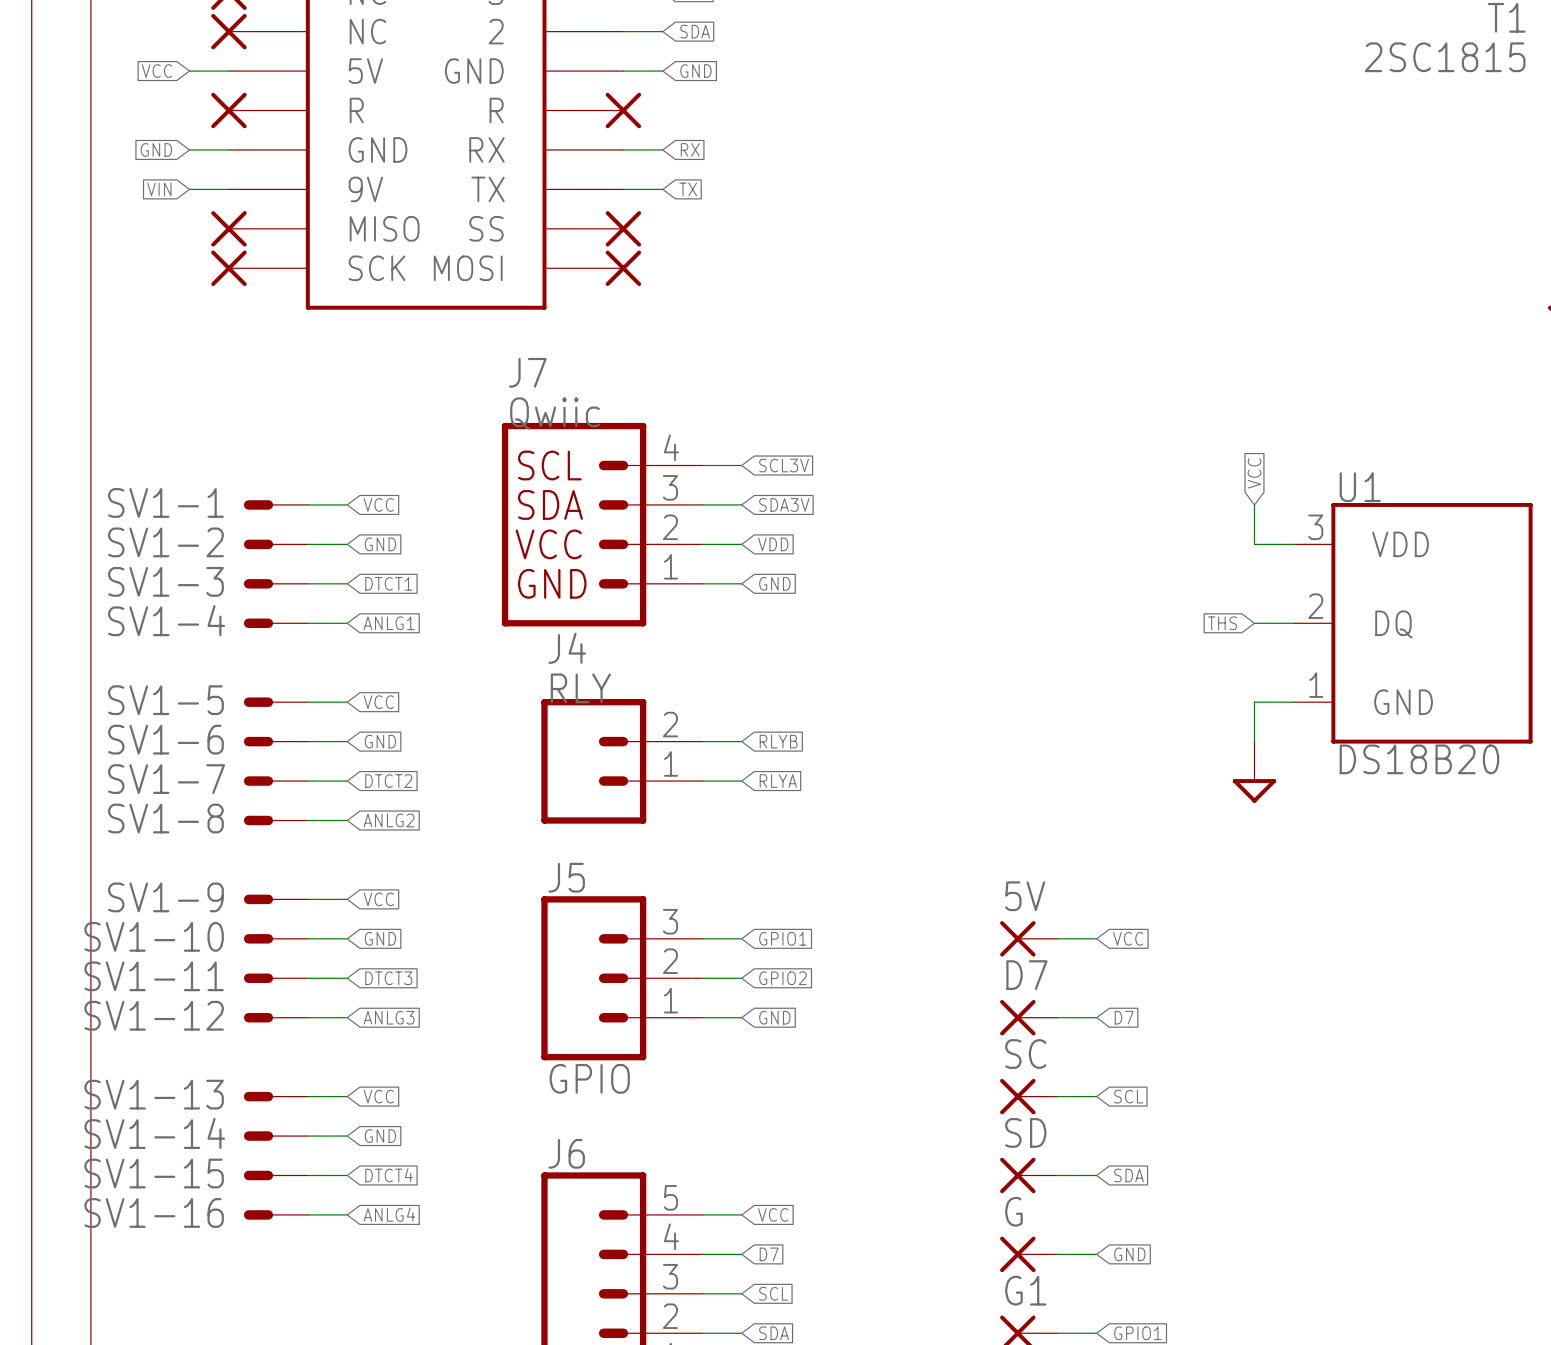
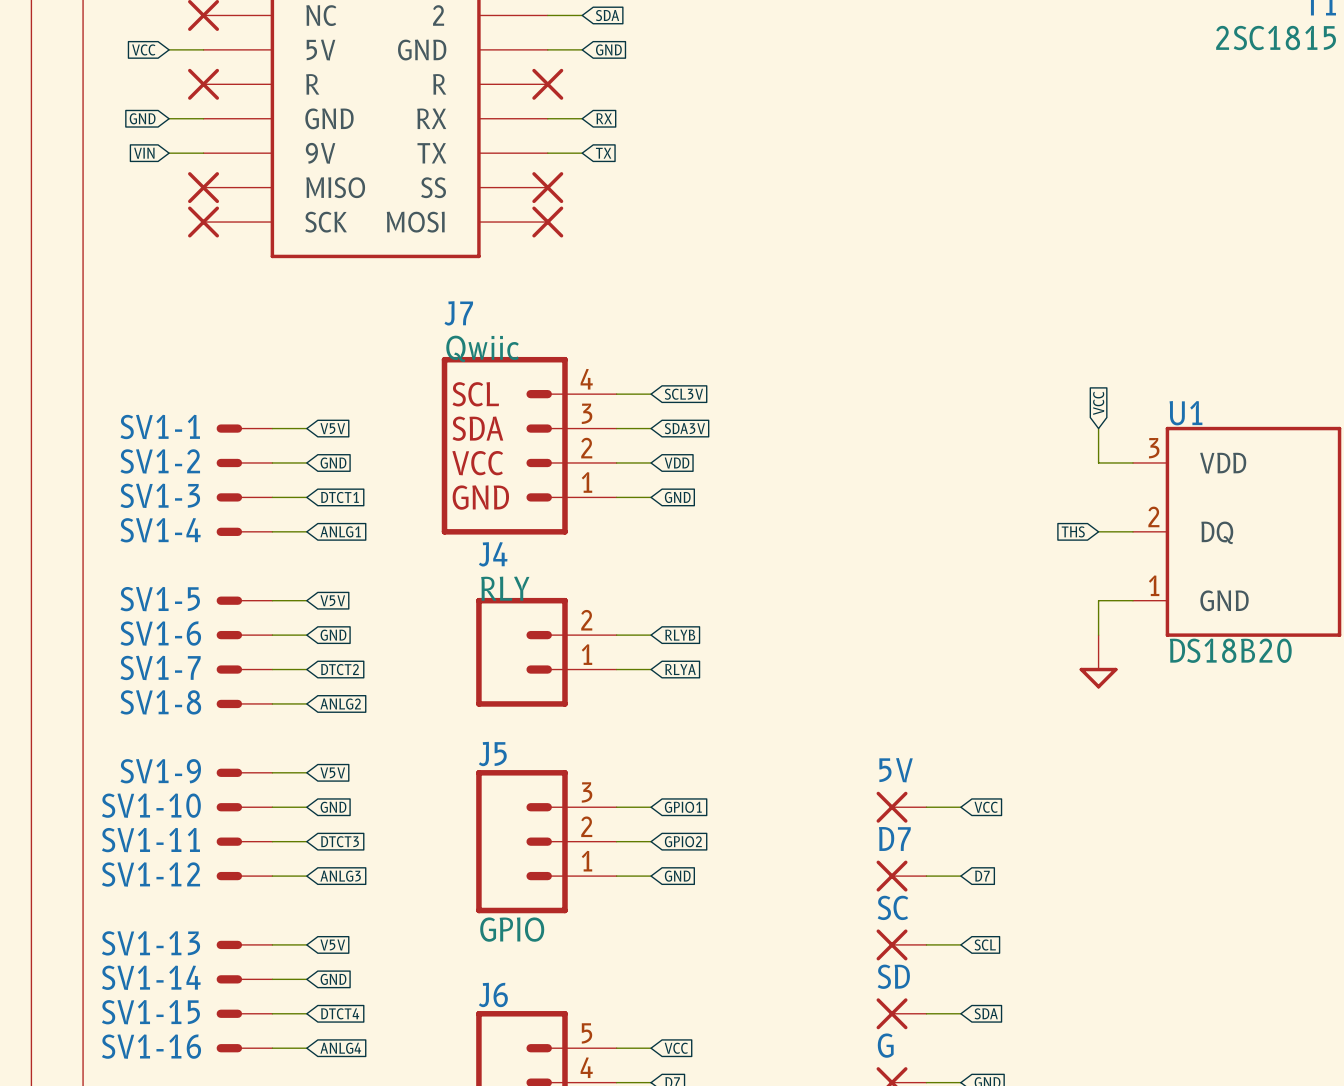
global label: VCC (378, 504) -> V5V (332, 428)
global label: VCC (378, 702) -> V5V (332, 600)
global label: VCC (378, 899) -> V5V (332, 772)
global label: VCC (378, 1096) -> V5V (332, 945)

